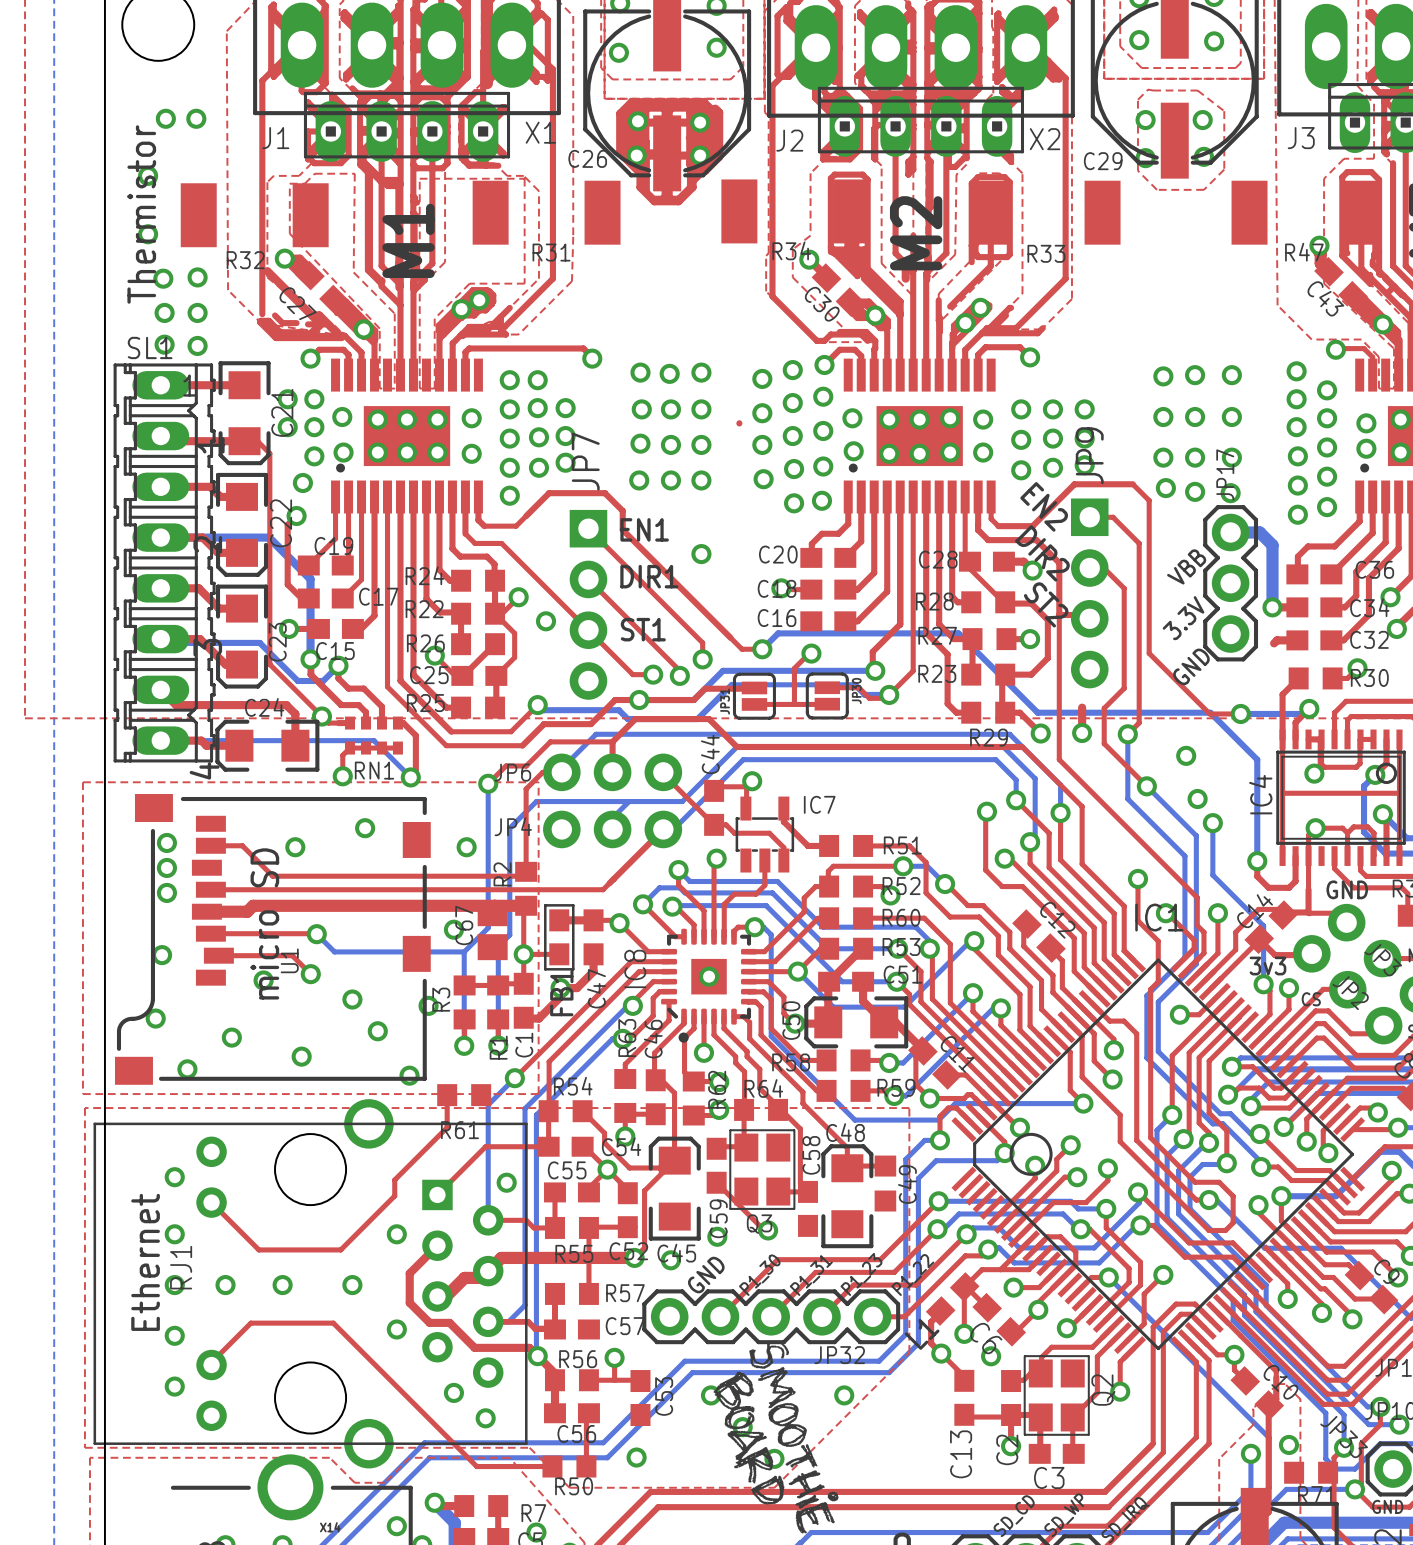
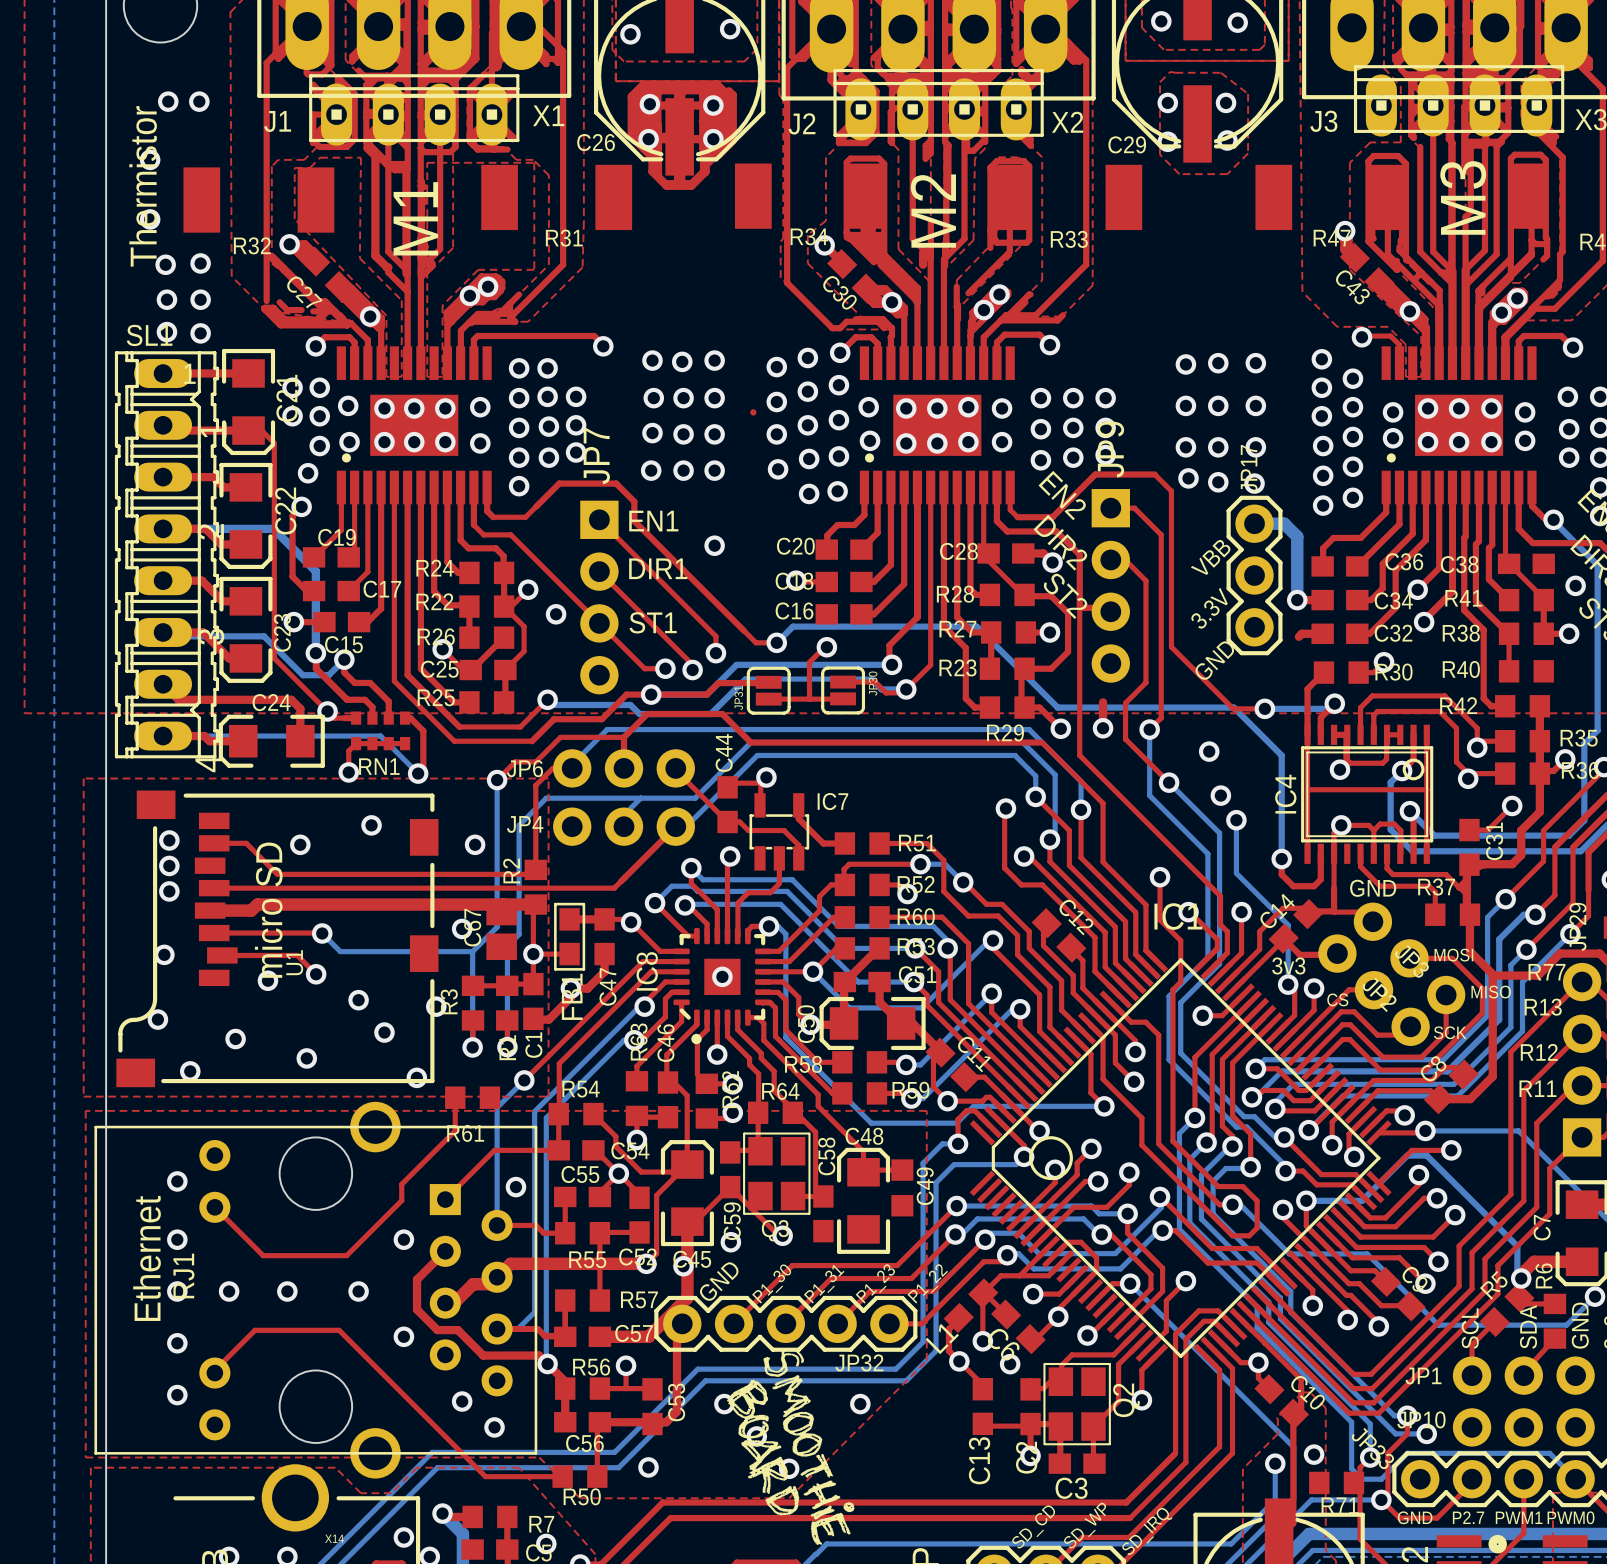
top track: none -> (730, 1187) (695, 1221)
top track: none -> (687, 1221) (687, 1297) (648, 1336) (599, 1336)
top track: none -> (678, 1307) (677, 1411) (666, 1422) (599, 1422)

